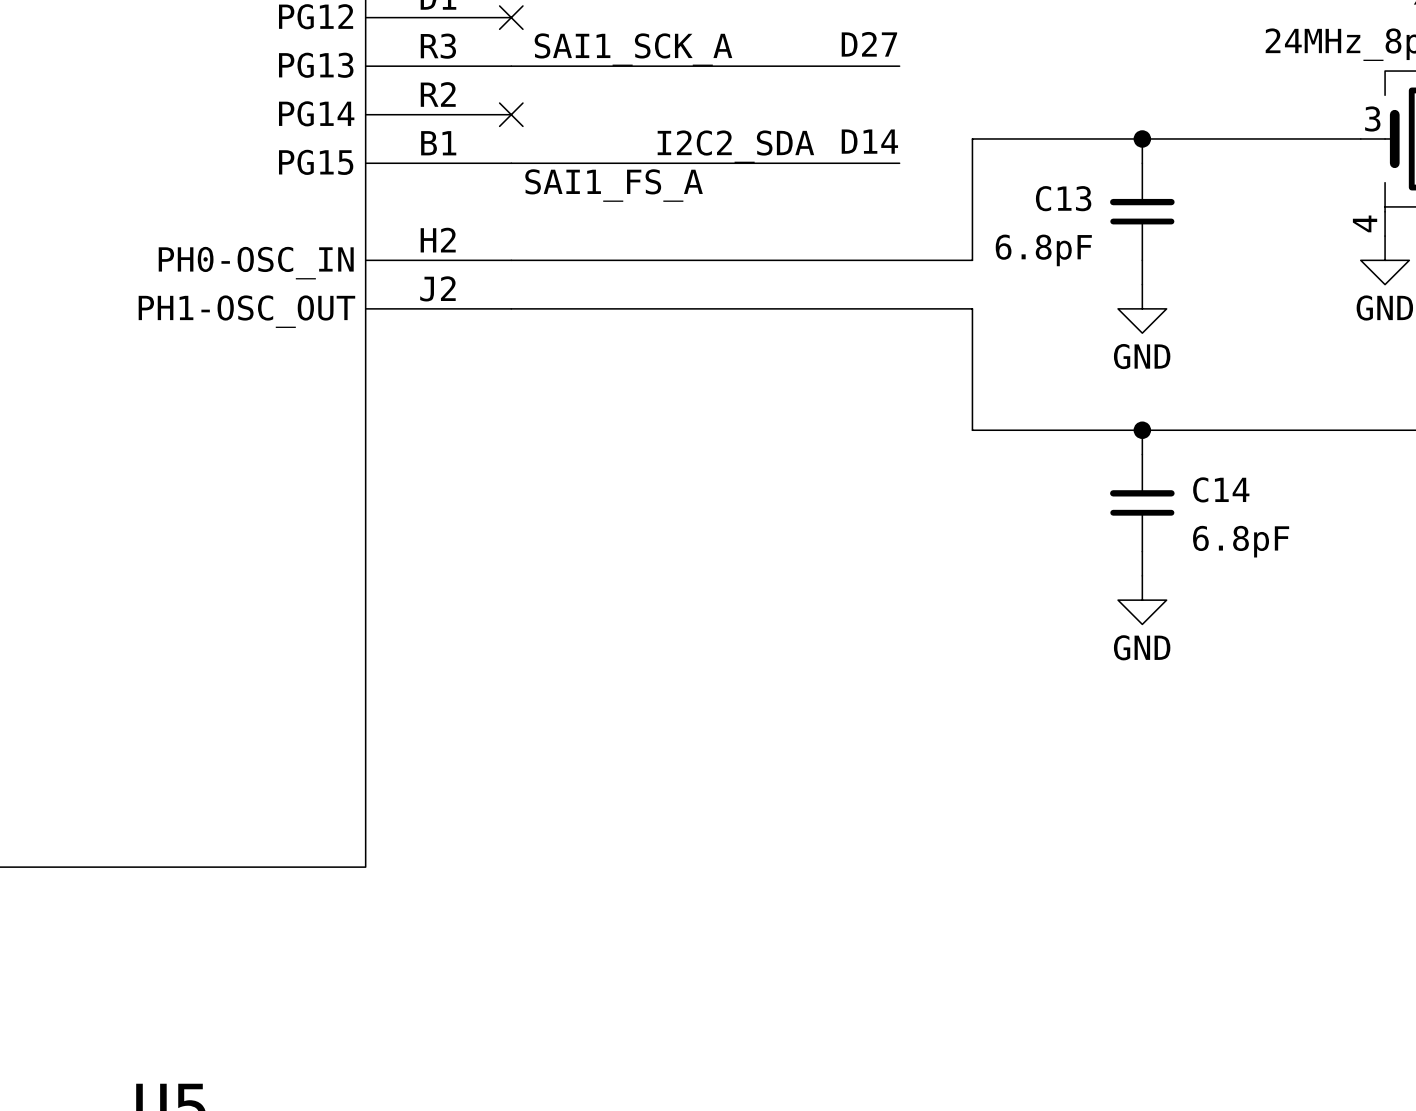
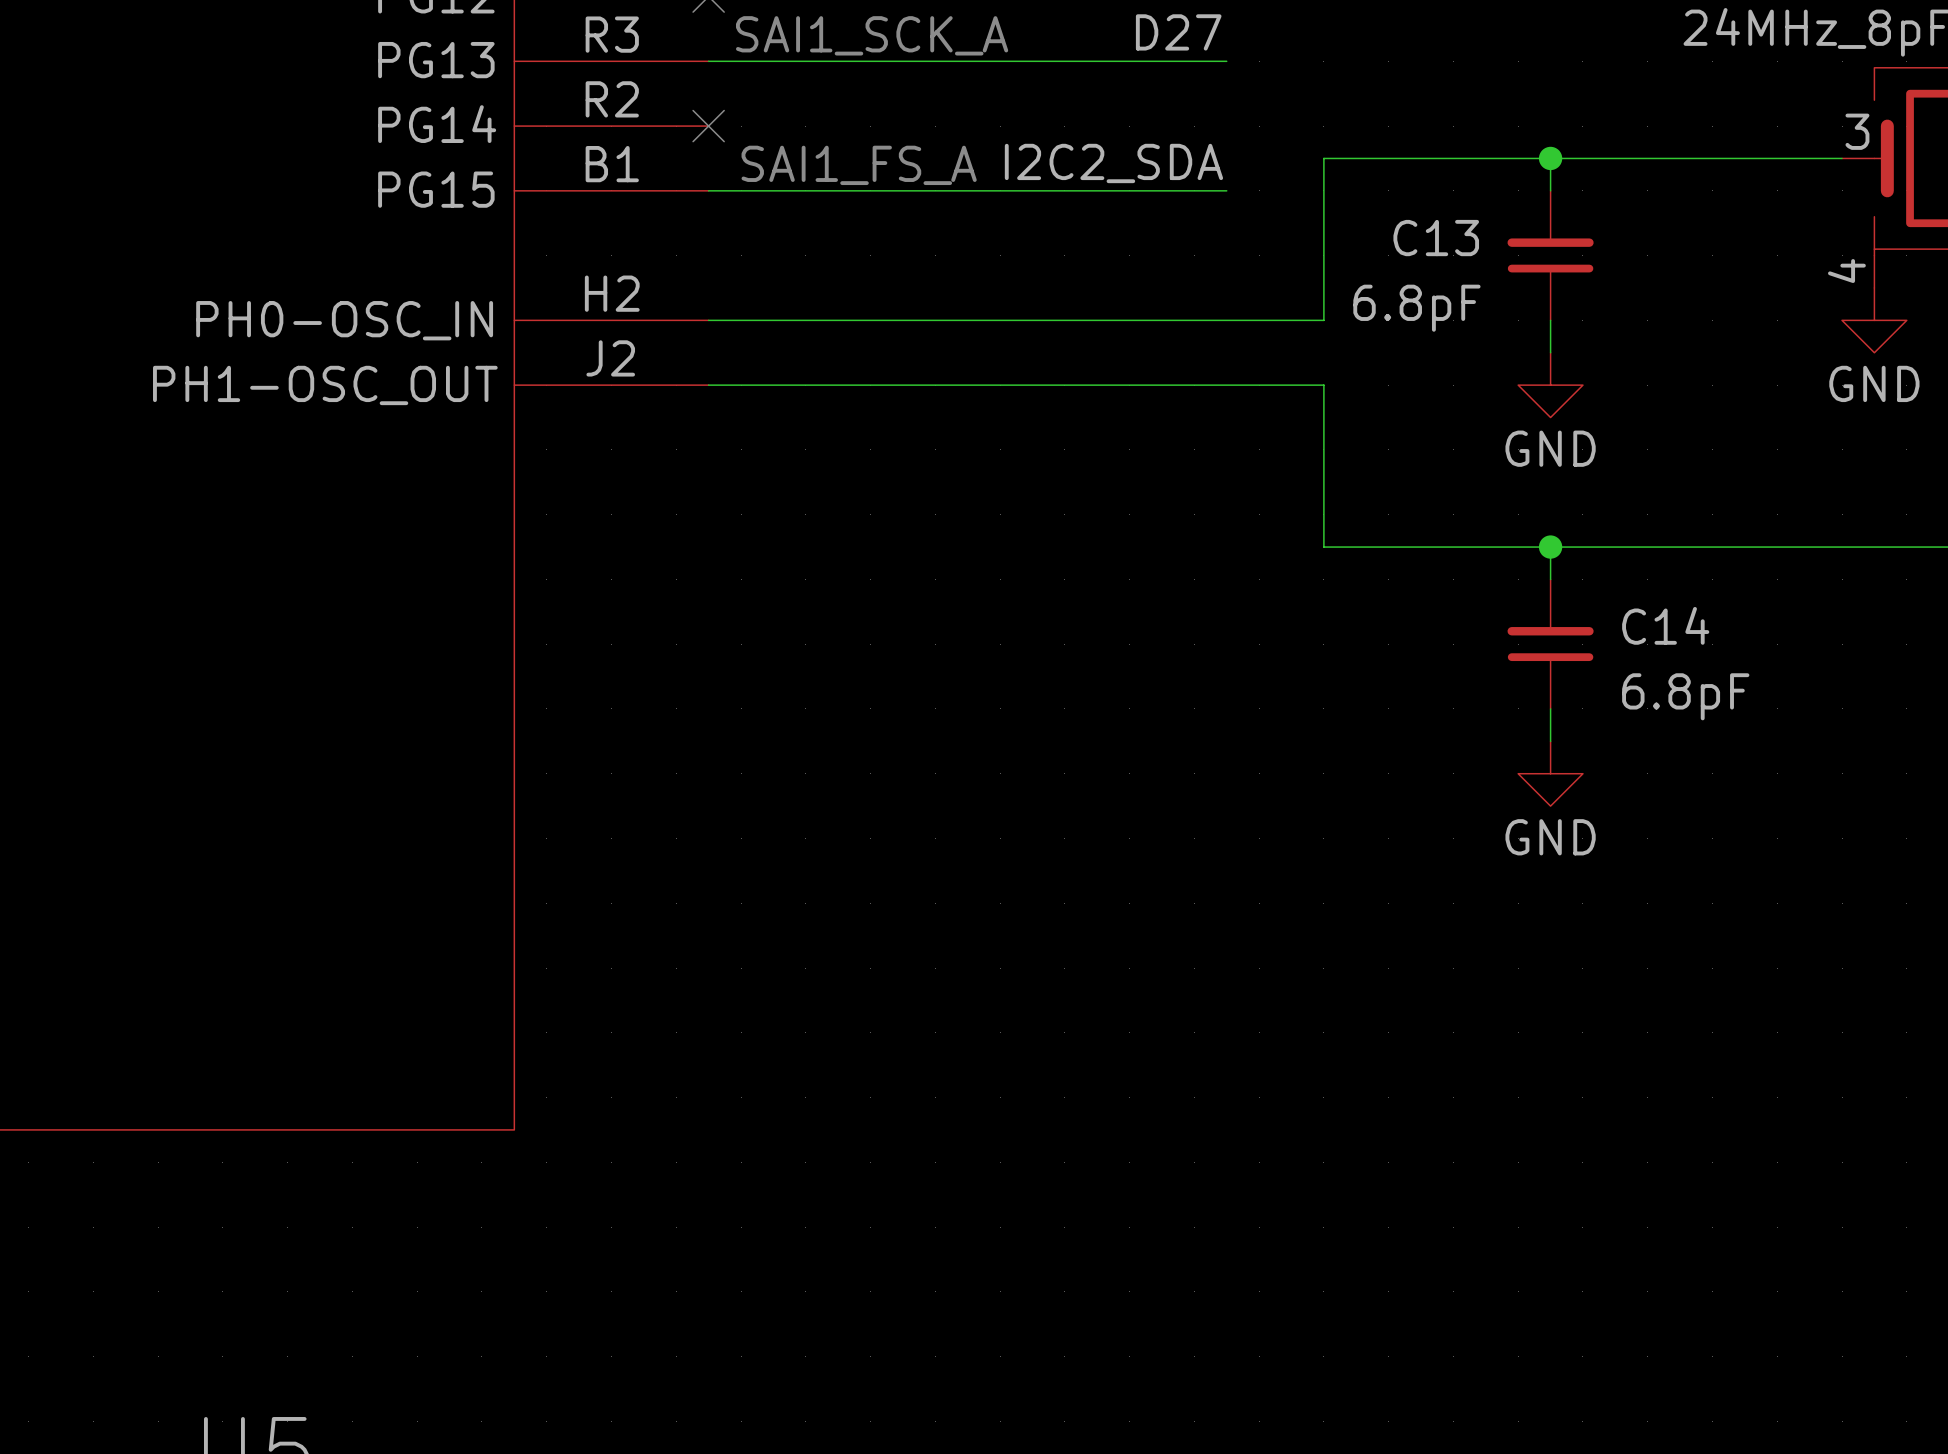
label: D14 (869, 141) -> I2C2_SDA (1113, 163)
text: I2C2_SDA (735, 146) -> none
text position: SAI1_FS_A (614, 185) -> SAI1_FS_A (859, 165)

